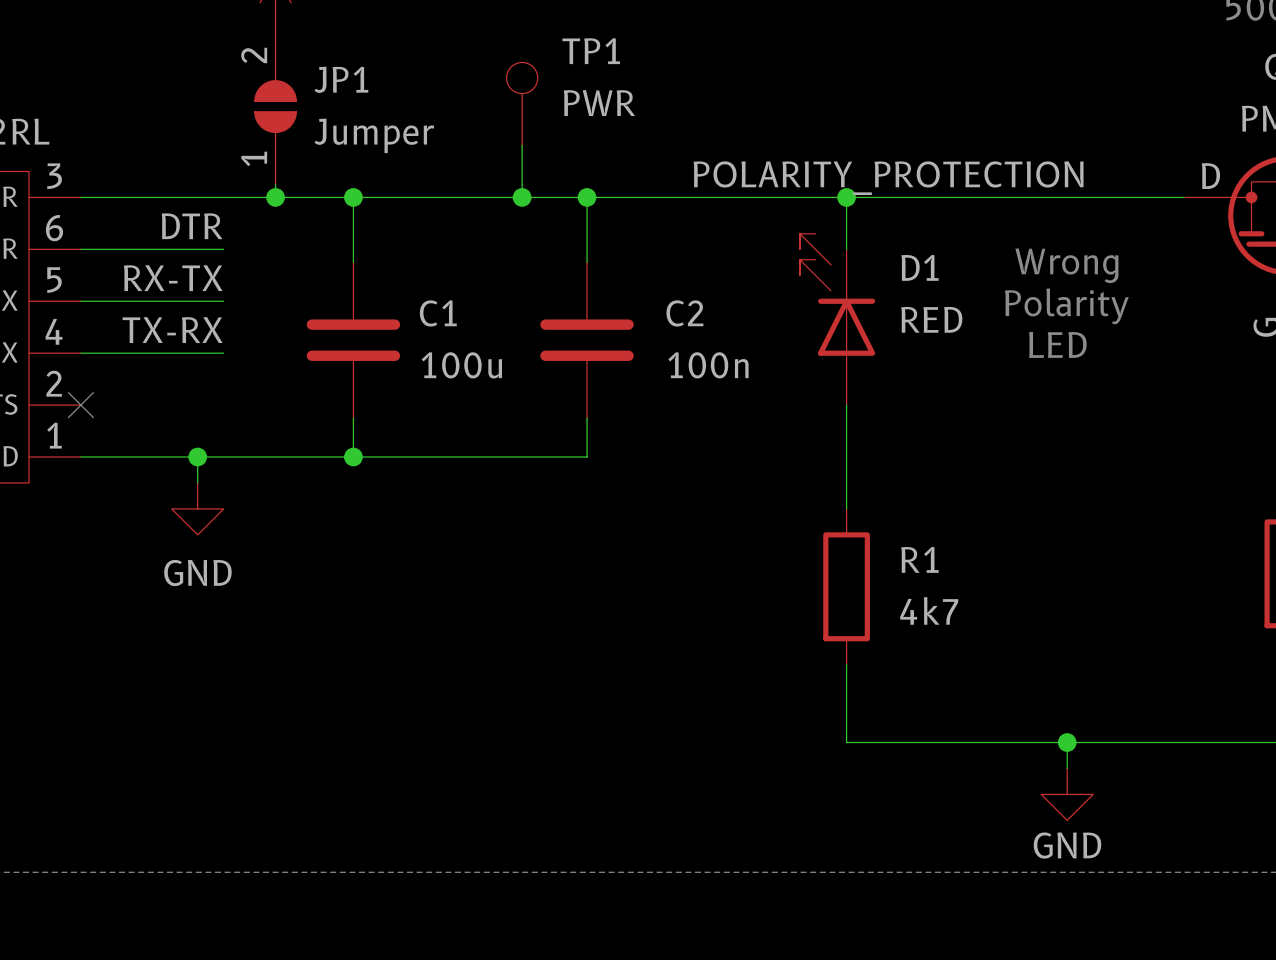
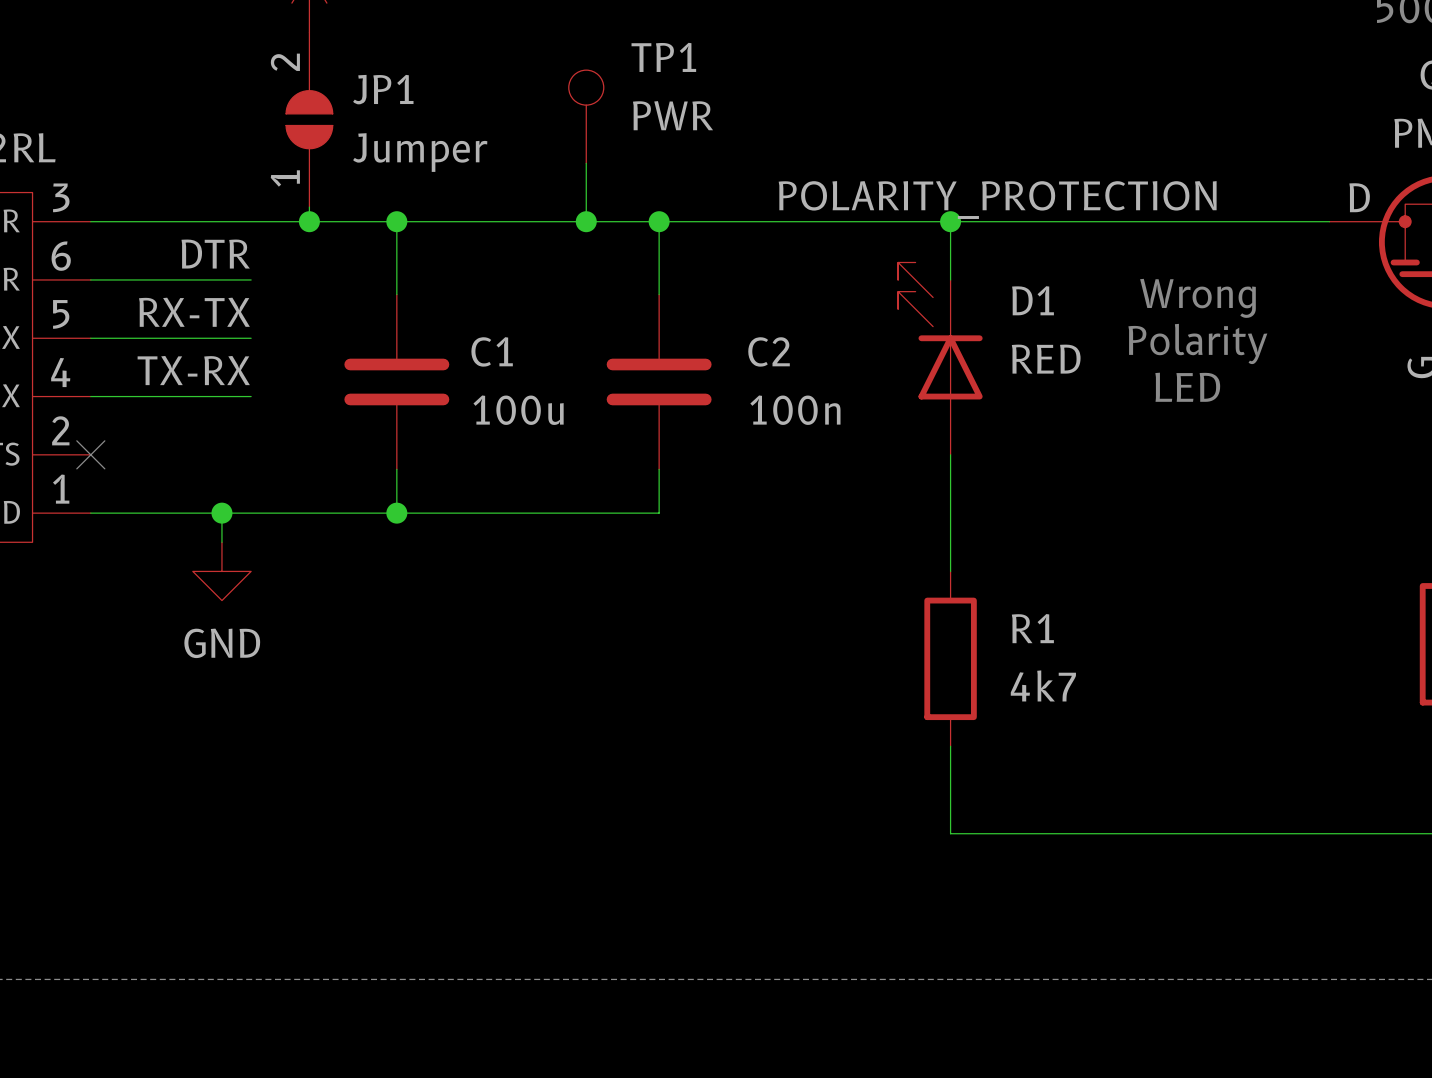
wire: (1067, 742) (1067, 768) -> none
junction: (1067, 742) -> none
power symbol: GND (1067, 794) -> none

